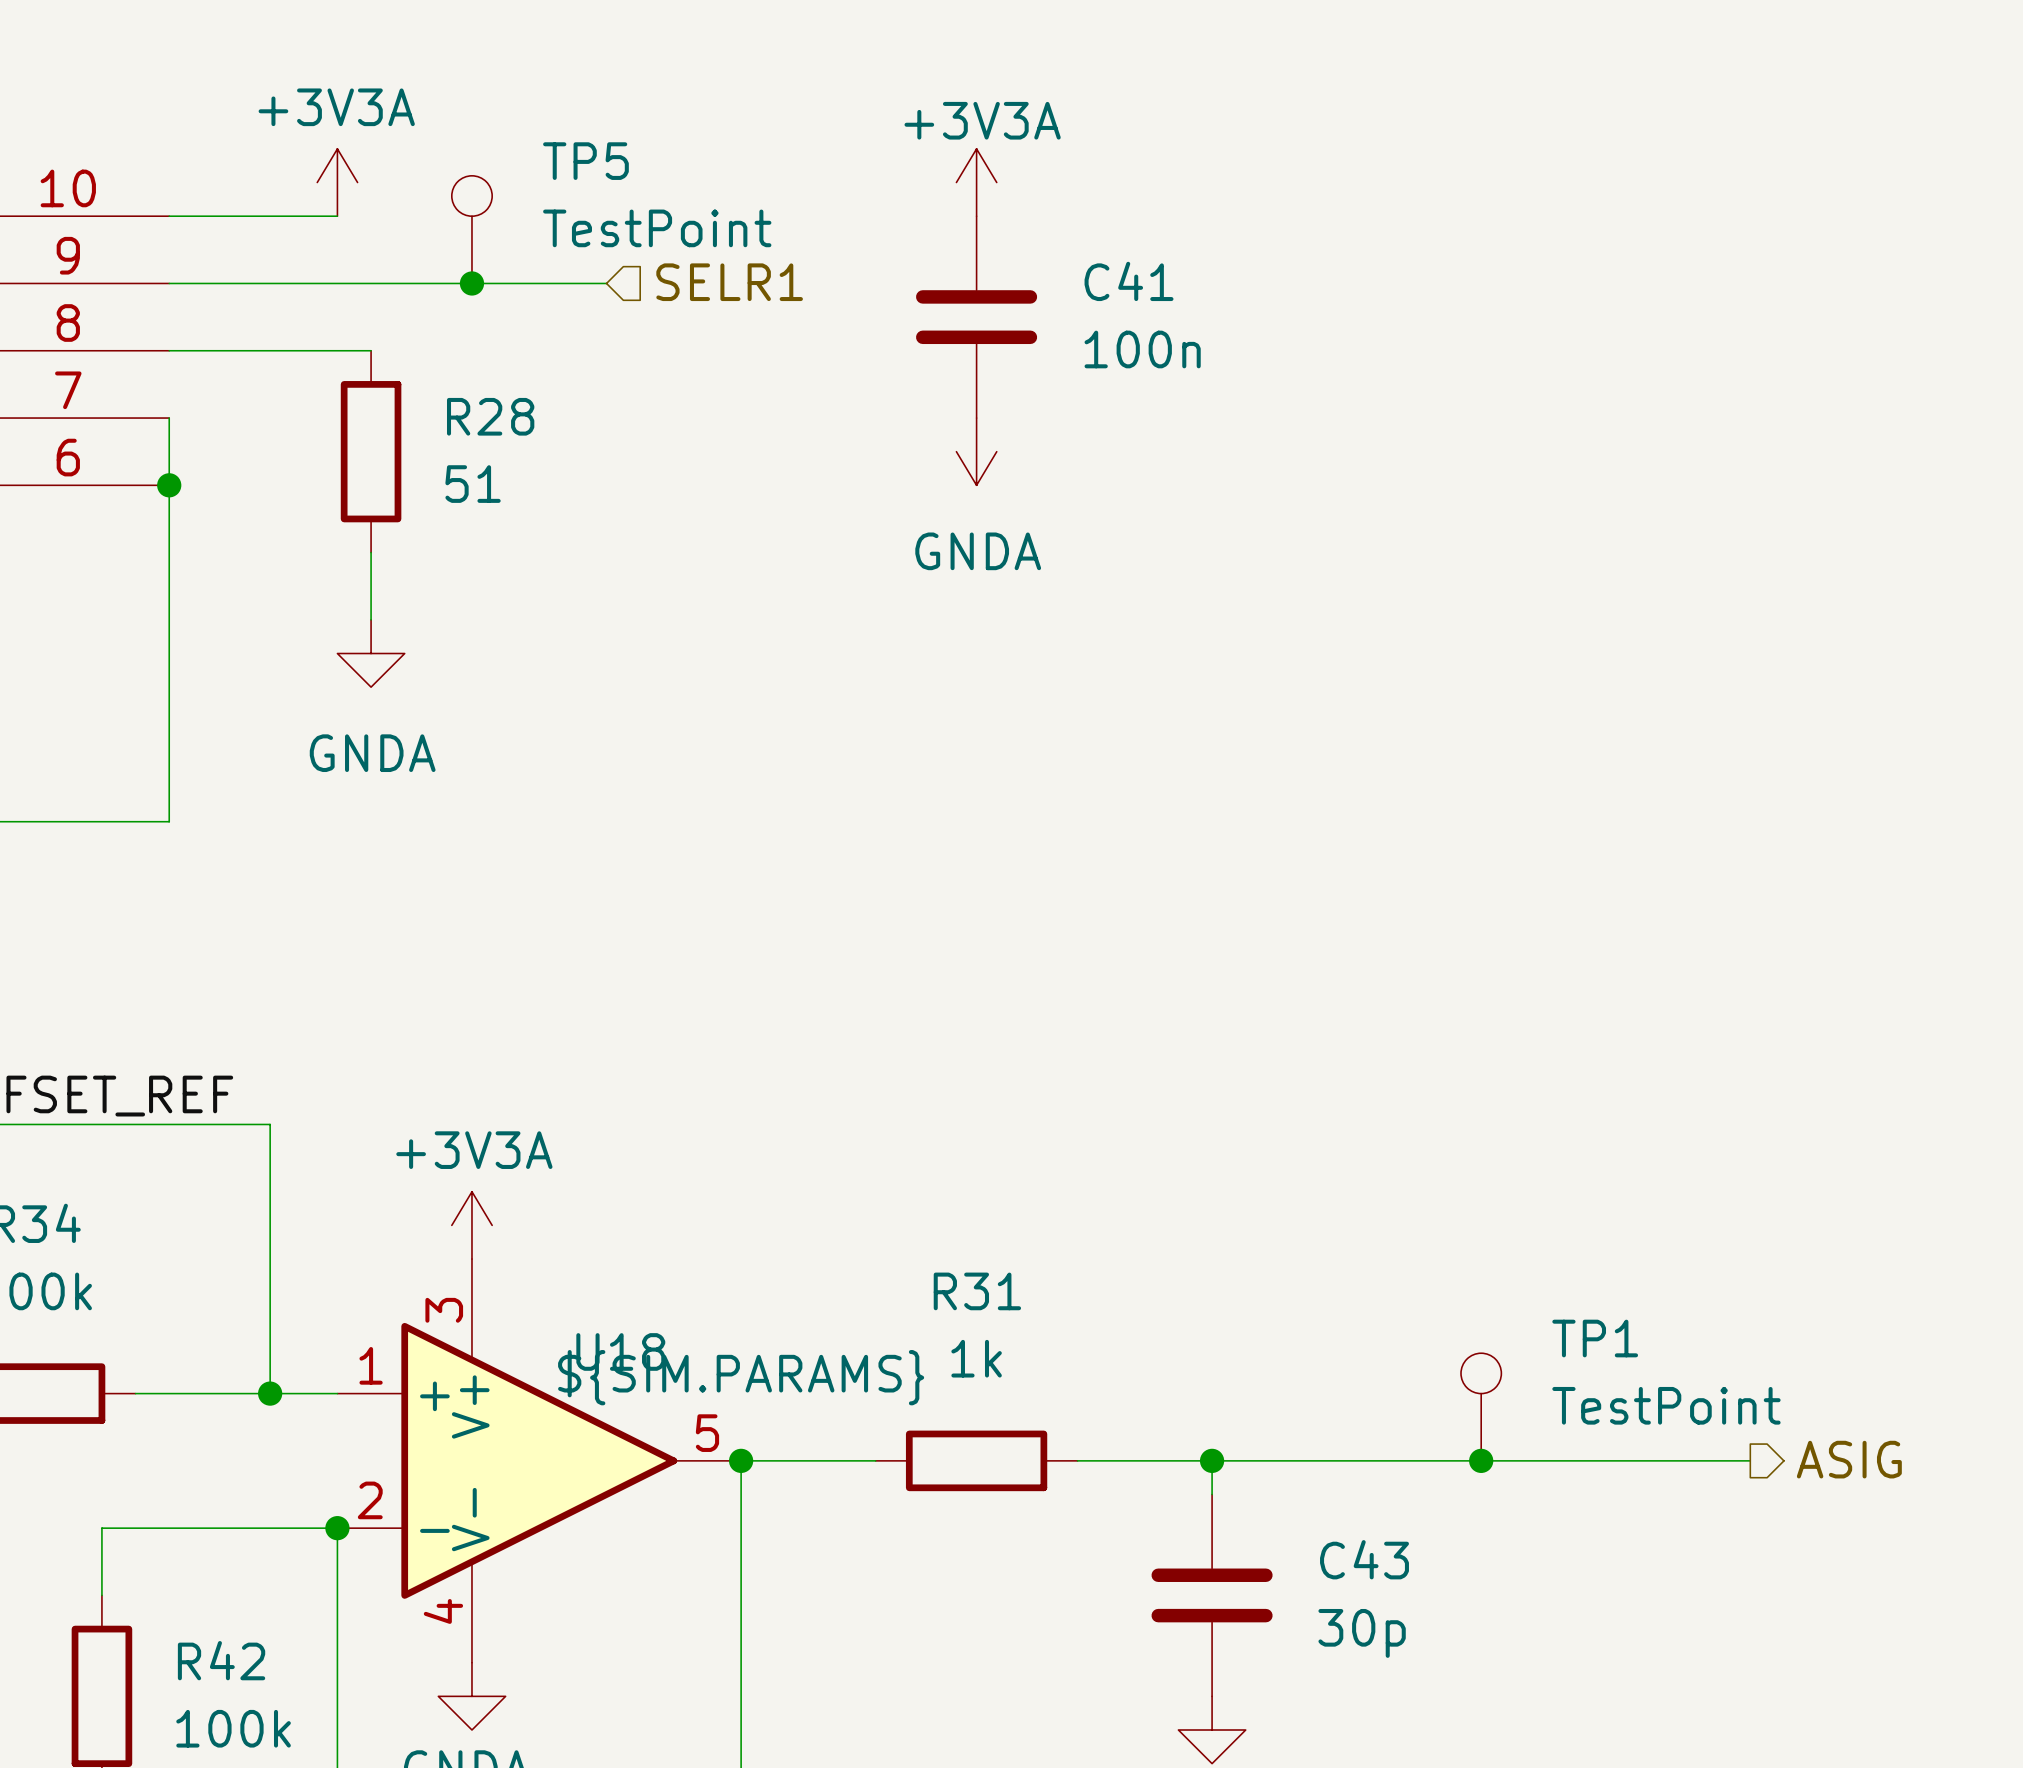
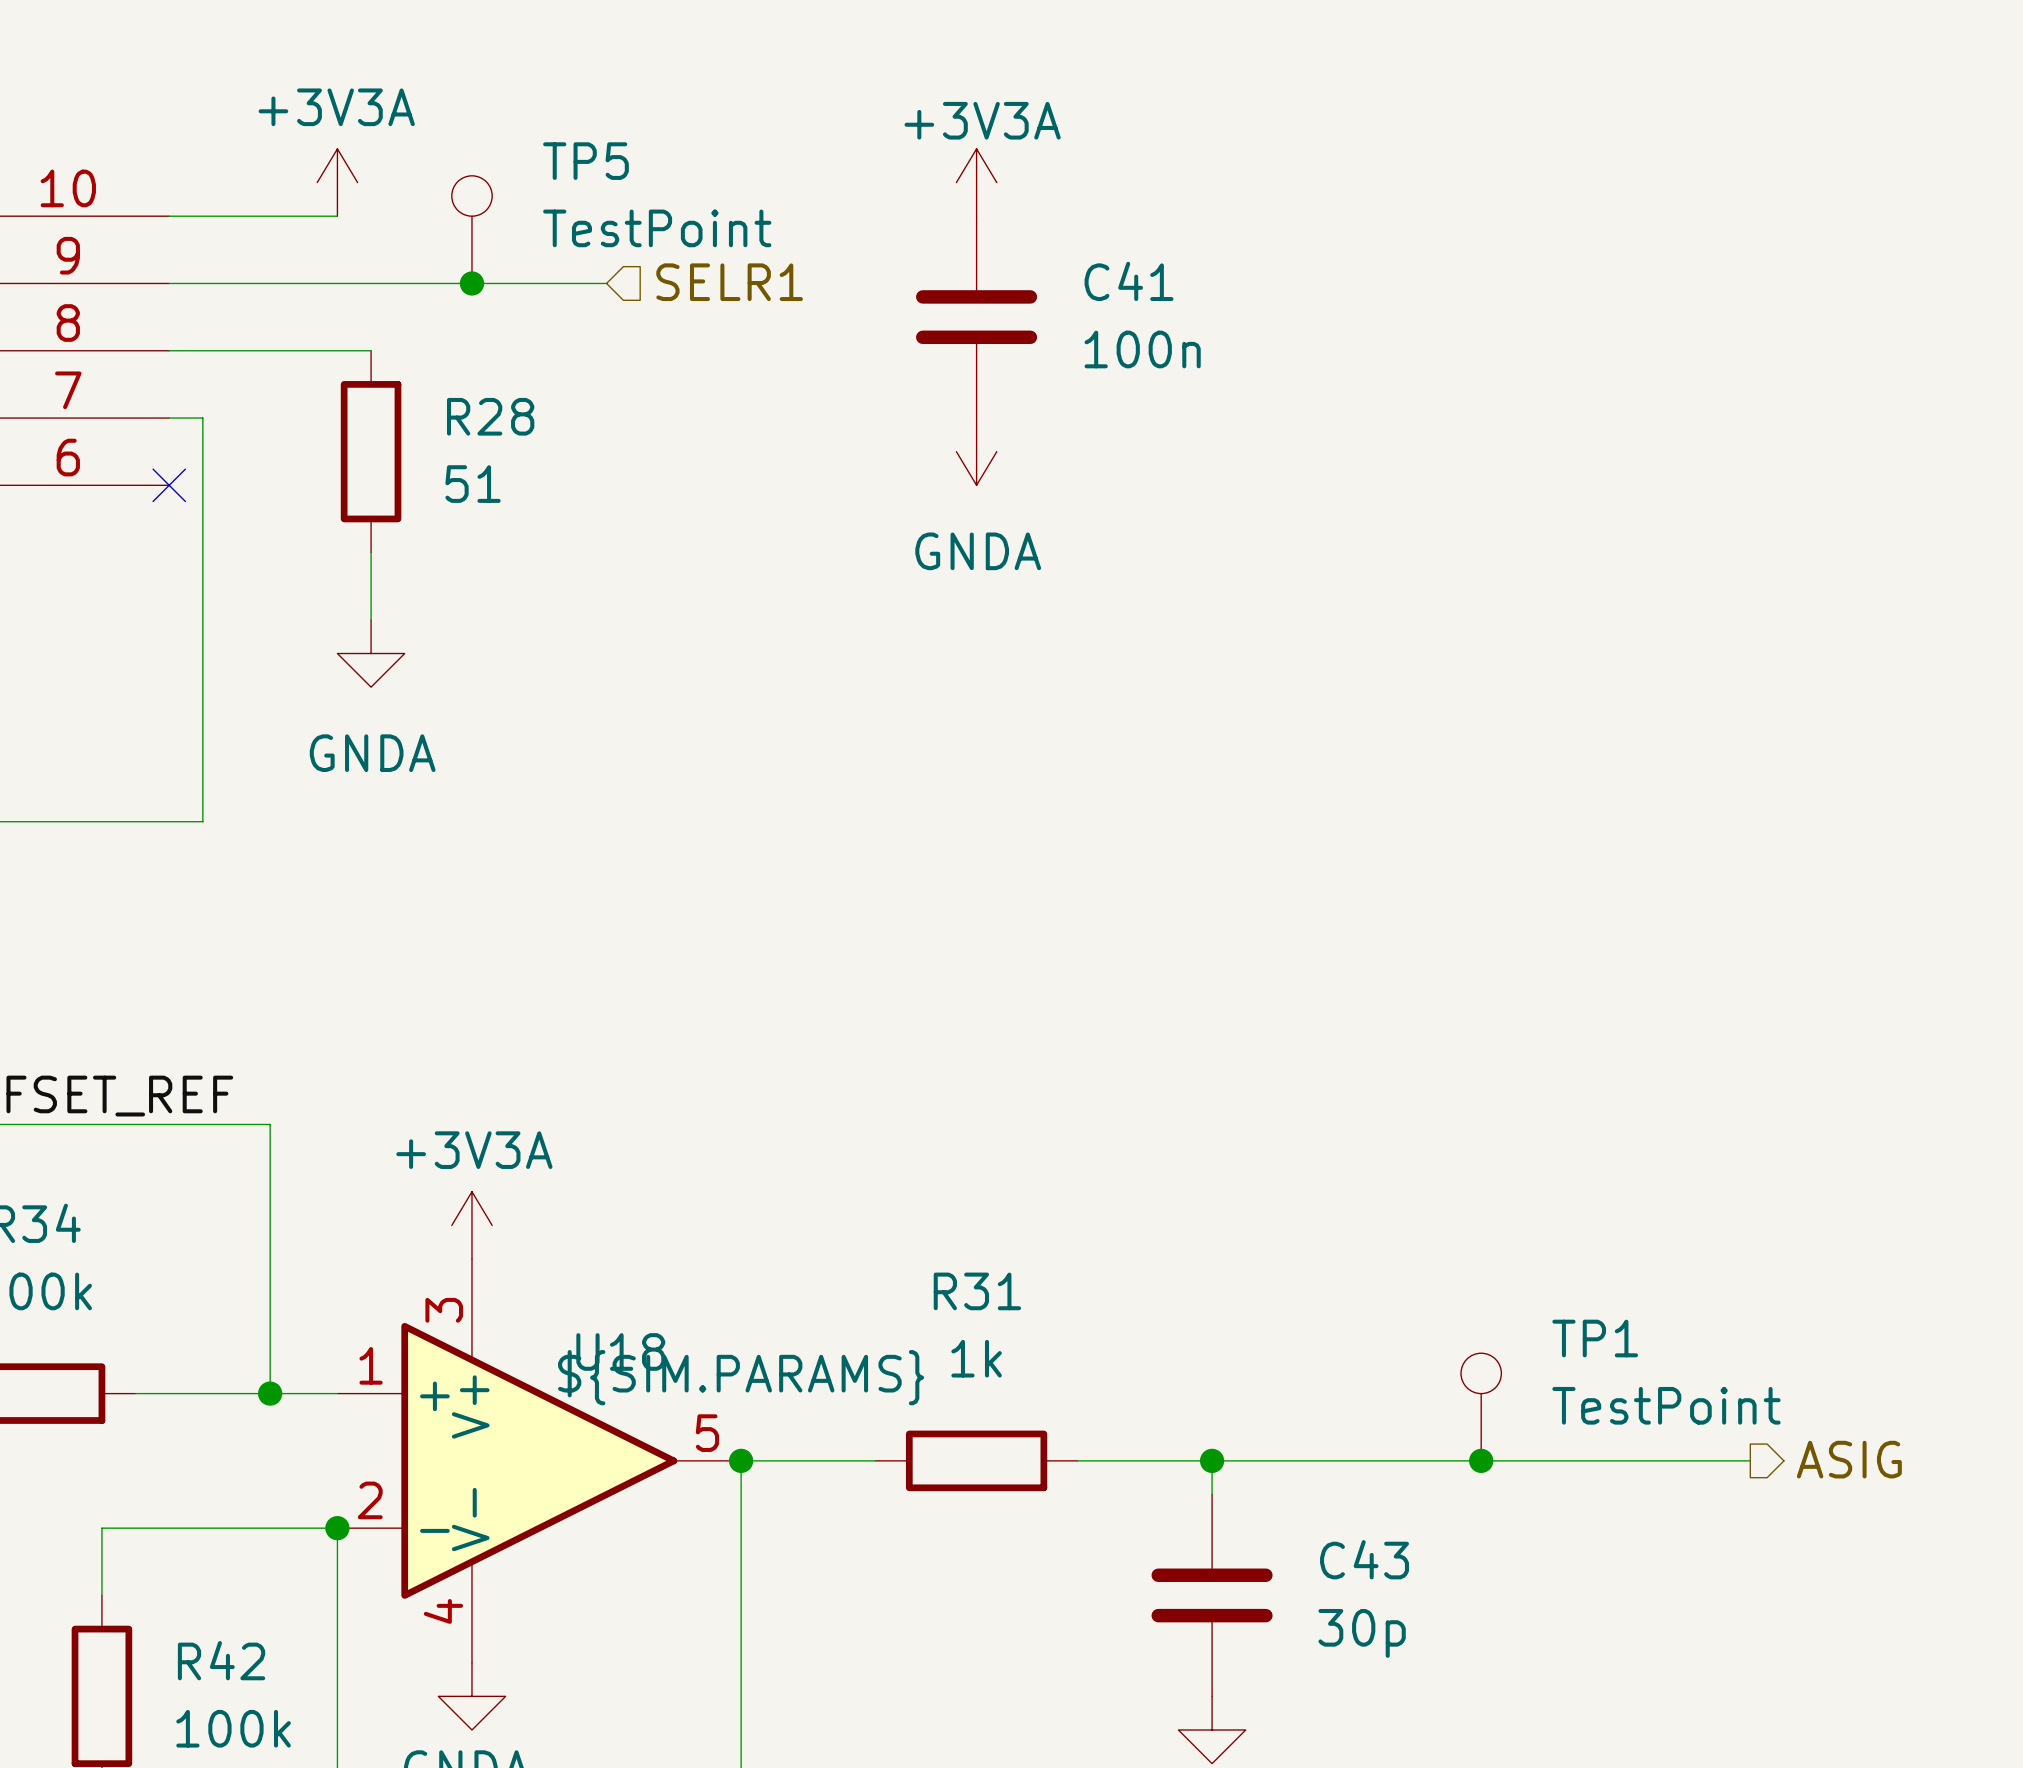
wire: (169, 418) (169, 821) -> (169, 418) (202, 418) (202, 821) (169, 821)
junction: (169, 485) -> none
no-connect mark: none -> (169, 485)

